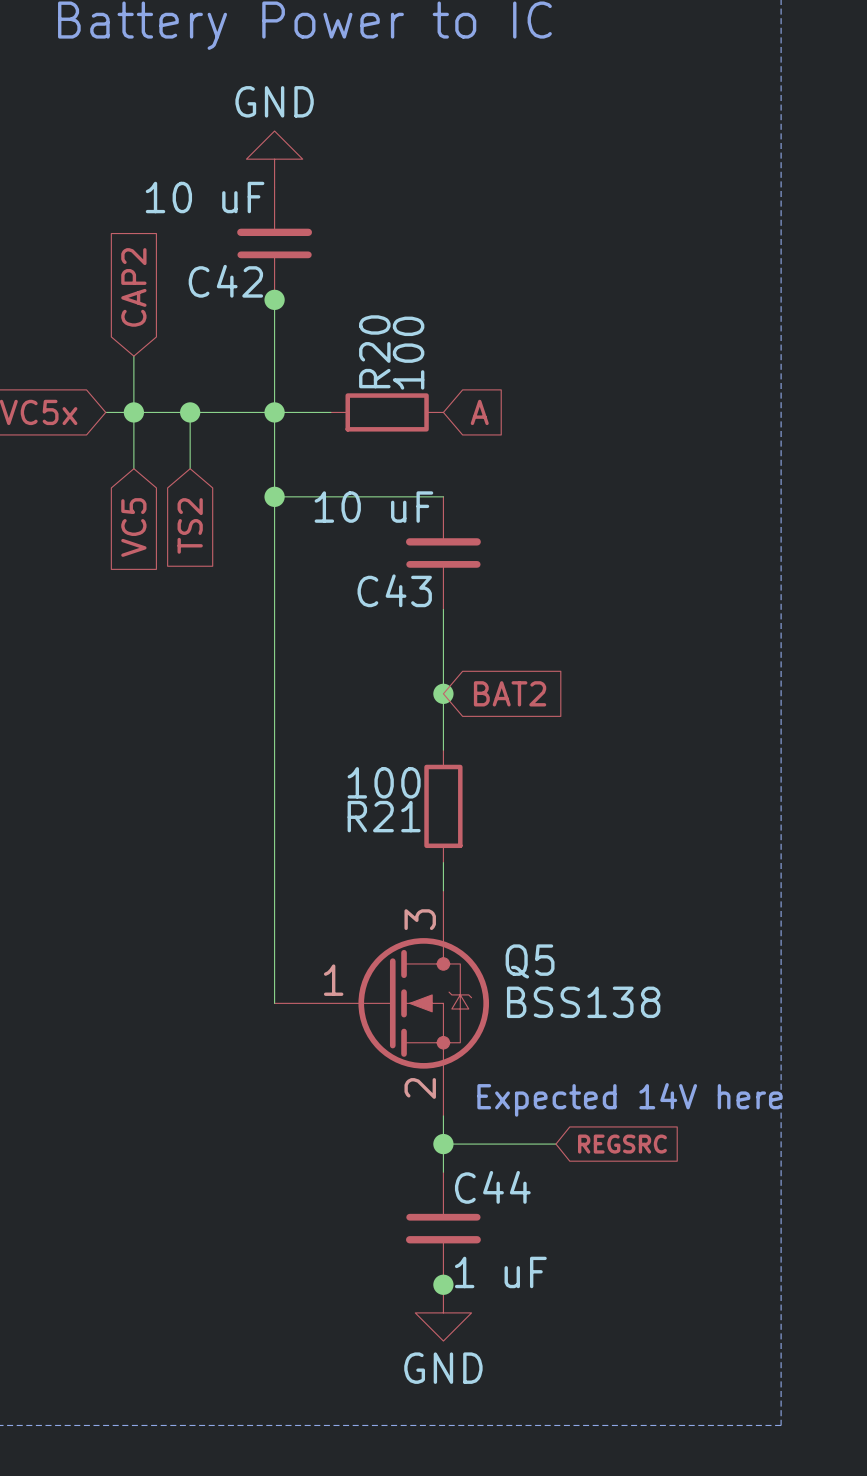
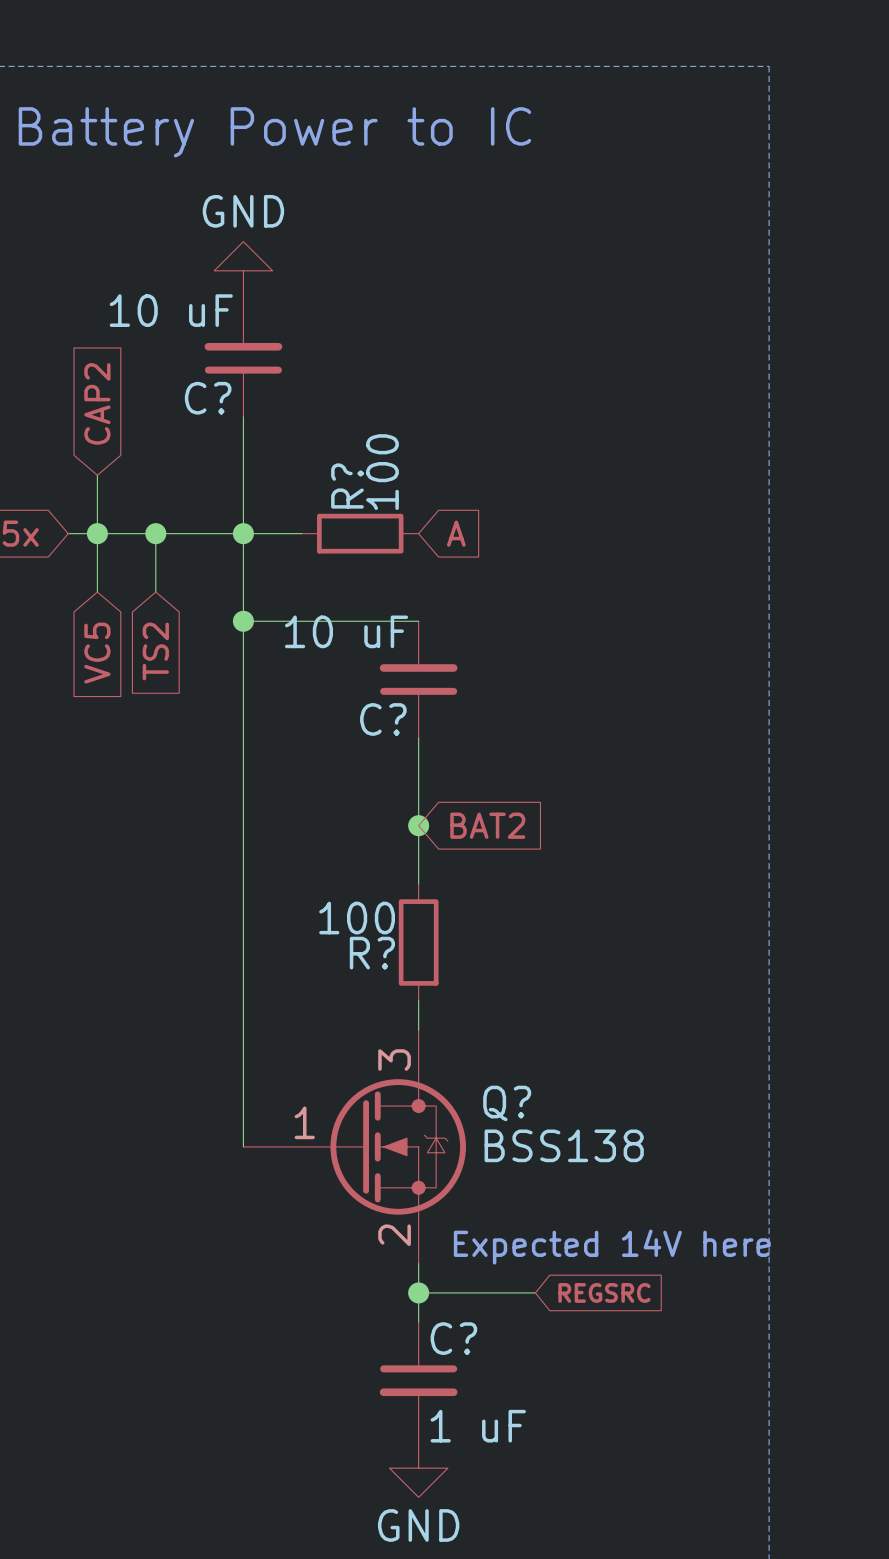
C42 name: C42 (225, 281) -> C? (208, 398)
junction: (274, 299) -> none
R20 name: R20 (374, 351) -> R? (347, 486)
C43 name: C43 (394, 590) -> C? (383, 719)
R21 name: R21 (384, 816) -> R? (372, 953)
Q5 name: Q5 (530, 961) -> Q? (507, 1103)
C44 name: C44 (492, 1187) -> C? (453, 1338)
junction: (443, 1284) -> none

